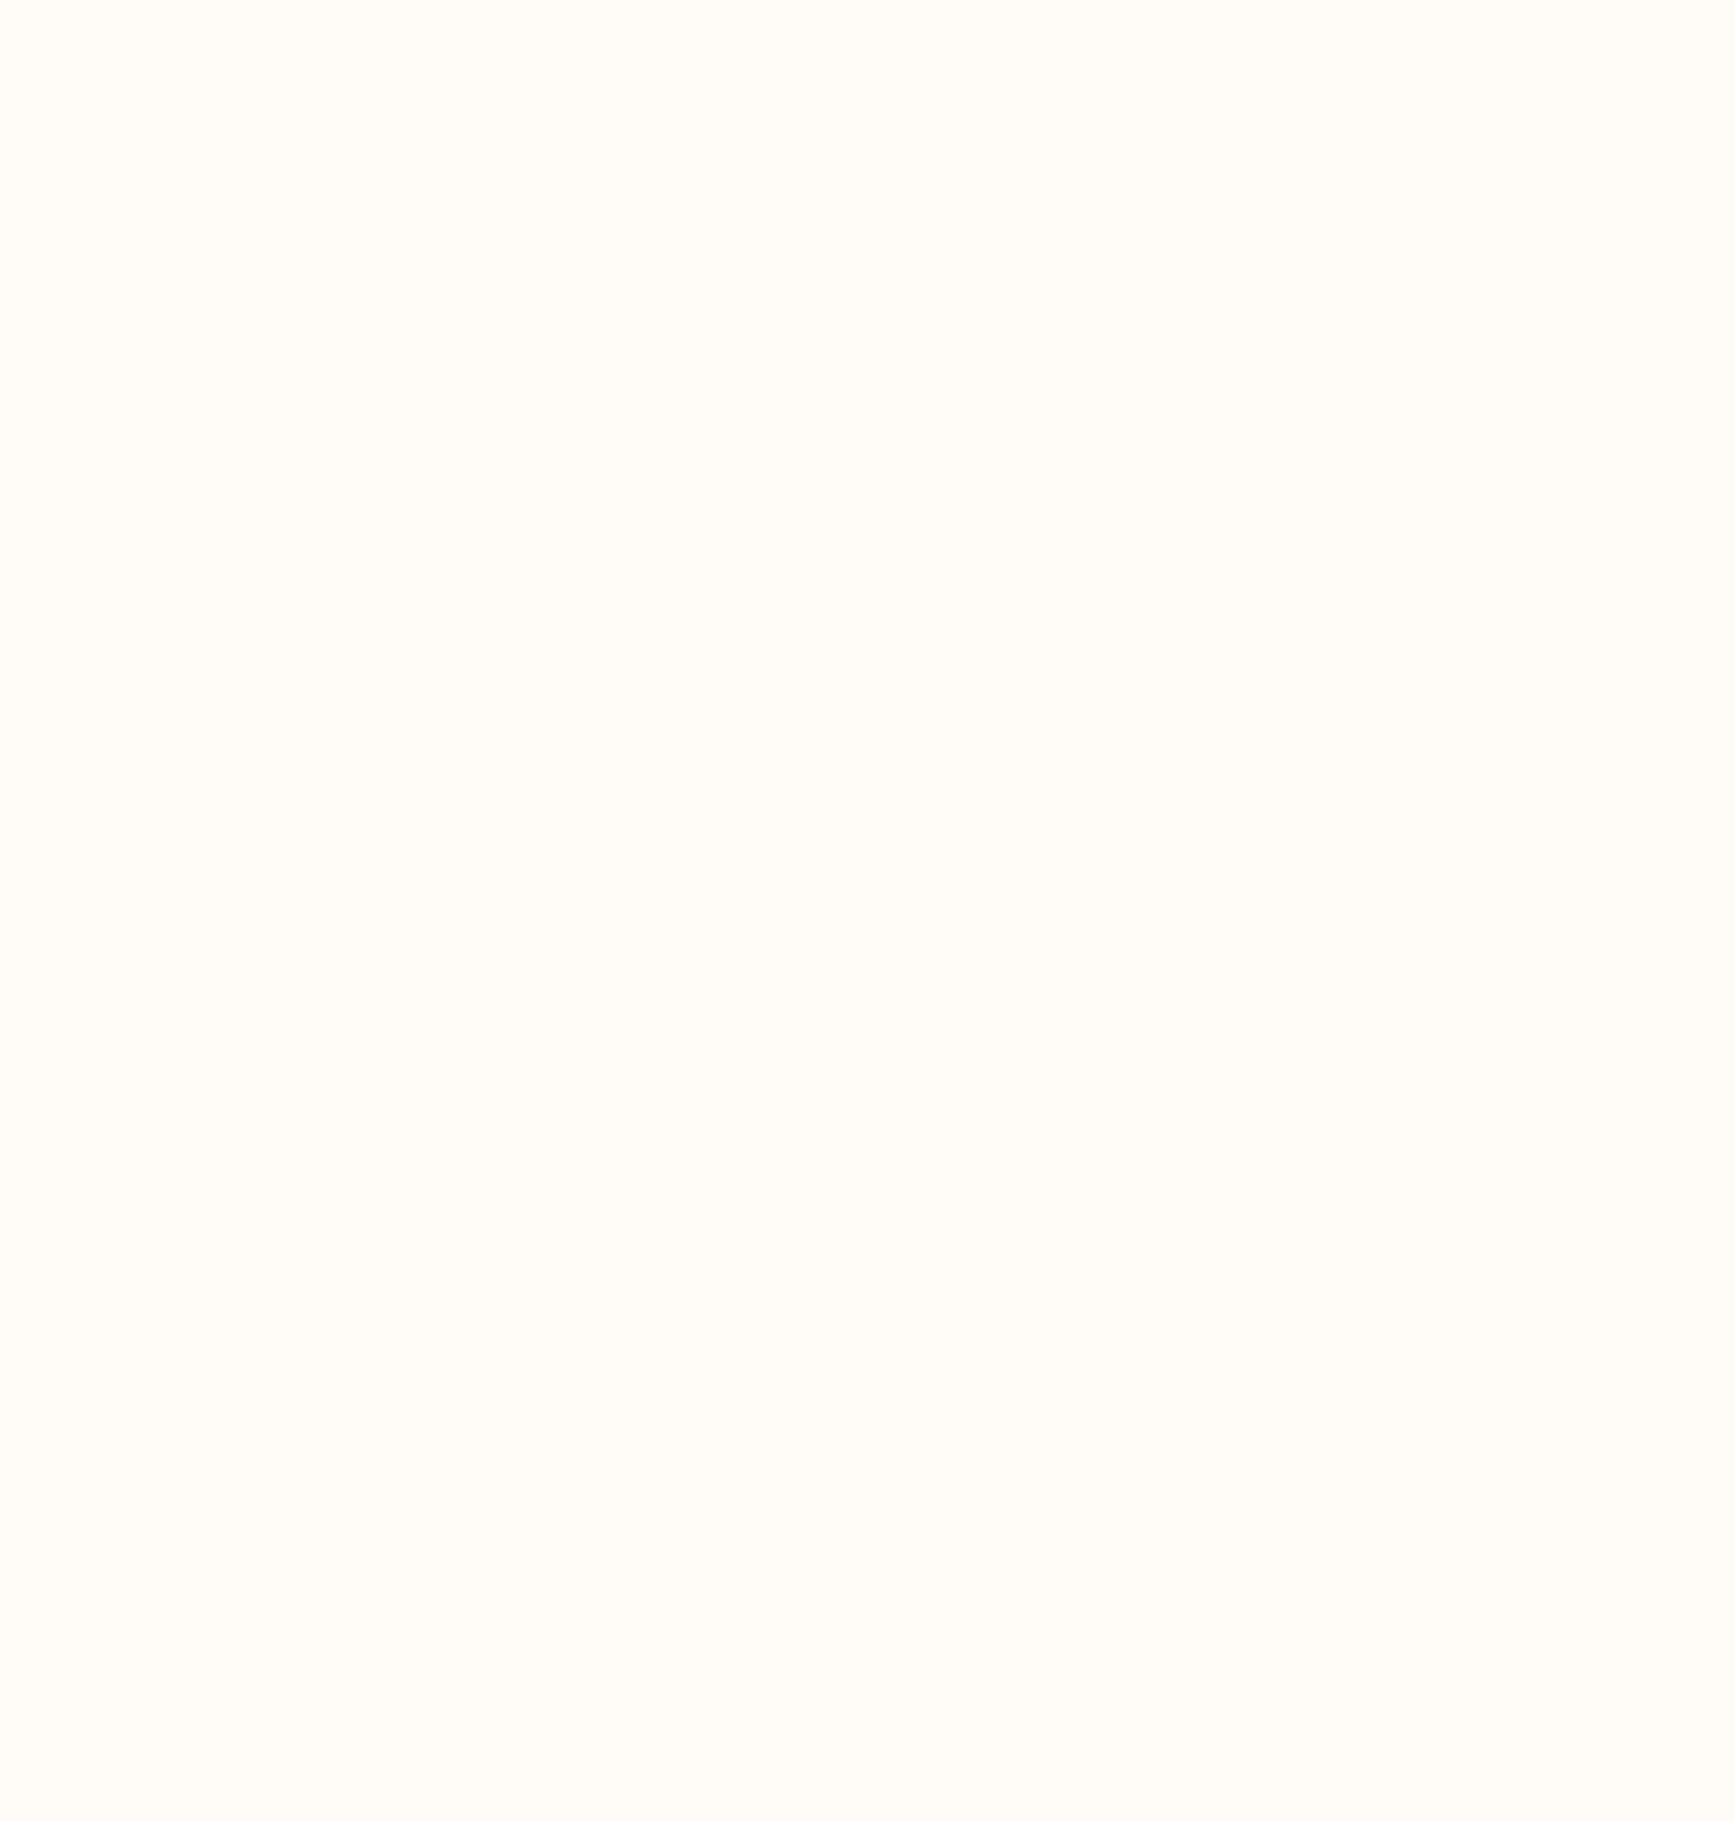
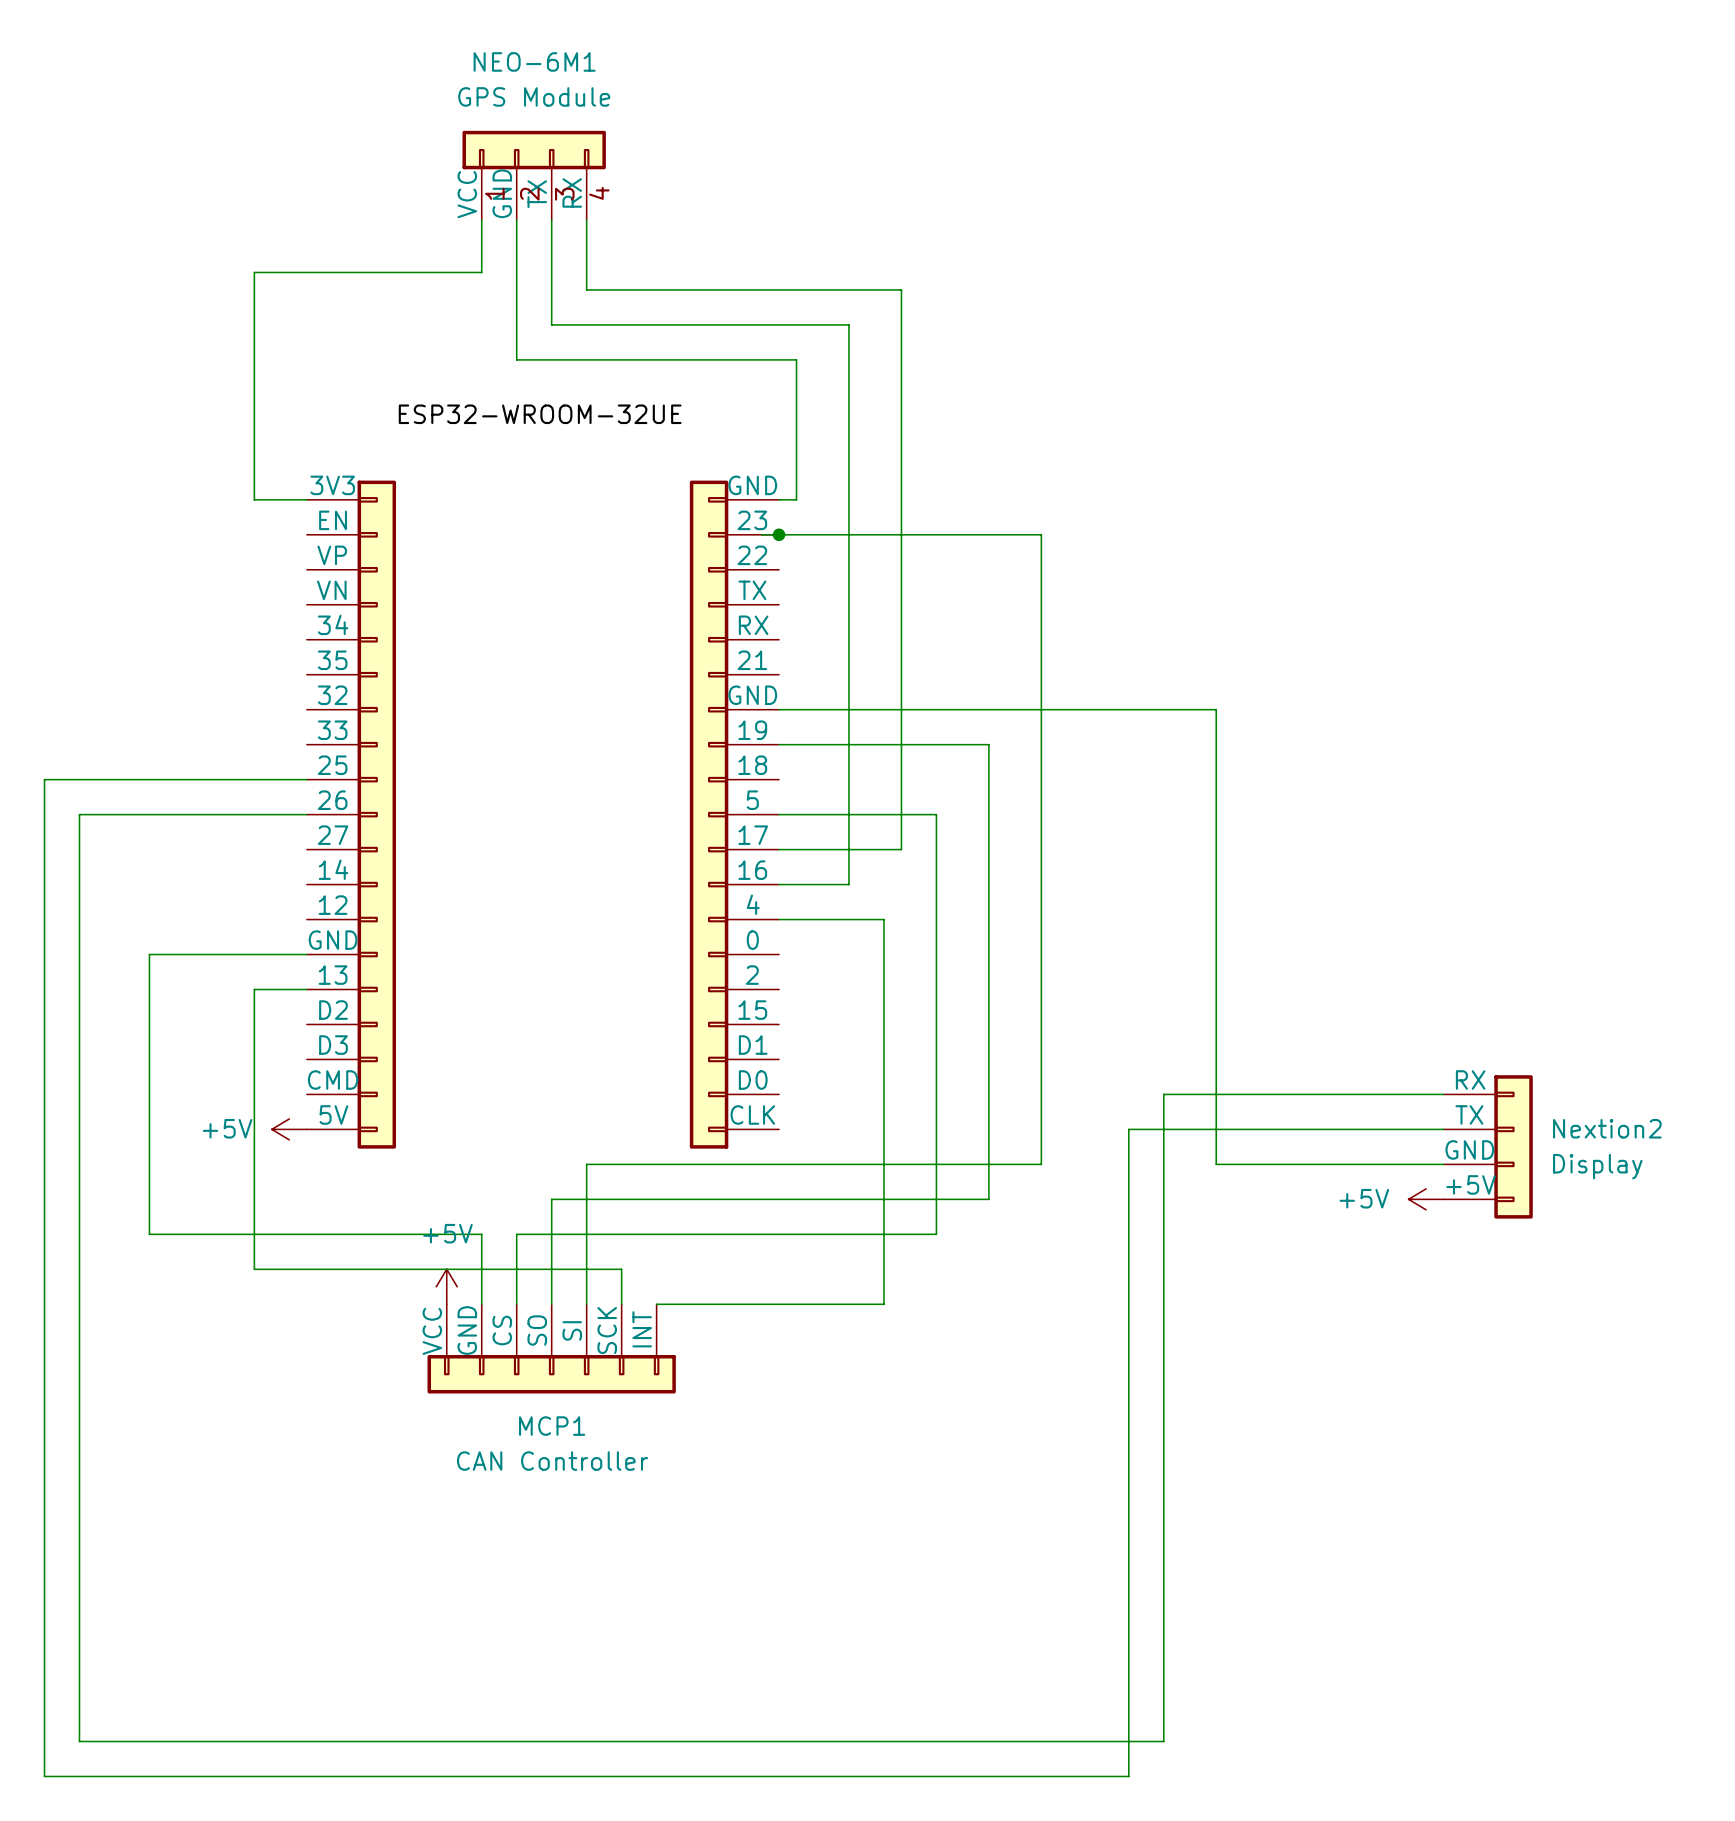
NEO-6M1: none -> GPS Module (534, 175)
wire: none -> (481, 220) (481, 272) (254, 272) (254, 499) (306, 499)
wire: none -> (516, 220) (516, 359) (796, 359) (796, 499) (779, 499)
wire: none -> (551, 220) (551, 324) (848, 324) (848, 884) (779, 884)
wire: none -> (586, 220) (586, 289) (901, 289) (901, 849) (779, 849)
label: none -> ESP32-WROOM-32UE (540, 414)
wire: none -> (761, 534) (1041, 534) (1041, 1164) (586, 1164) (586, 1304)
junction: none -> (779, 534)
wire: none -> (779, 709) (1216, 709) (1216, 1164) (1443, 1164)
wire: none -> (779, 744) (988, 744) (988, 1199) (551, 1199) (551, 1304)
wire: none -> (306, 779) (44, 779) (44, 1776) (1128, 1776) (1128, 1129) (1443, 1129)
wire: none -> (306, 814) (79, 814) (79, 1741) (1163, 1741) (1163, 1094) (1443, 1094)
part: none -> (351, 814)
part: none -> (734, 814)
wire: none -> (779, 814) (936, 814) (936, 1234) (516, 1234) (516, 1304)
wire: none -> (779, 919) (883, 919) (883, 1304) (656, 1304)
wire: none -> (306, 954) (149, 954) (149, 1234) (481, 1234) (481, 1304)
wire: none -> (306, 989) (254, 989) (254, 1269) (621, 1269) (621, 1304)
power symbol: none -> +5V (289, 1129)
Nextion2: none -> Display (1488, 1146)
power symbol: none -> +5V (1426, 1199)
power symbol: none -> +5V (446, 1286)
MCP1: none -> CAN Controller (551, 1348)

